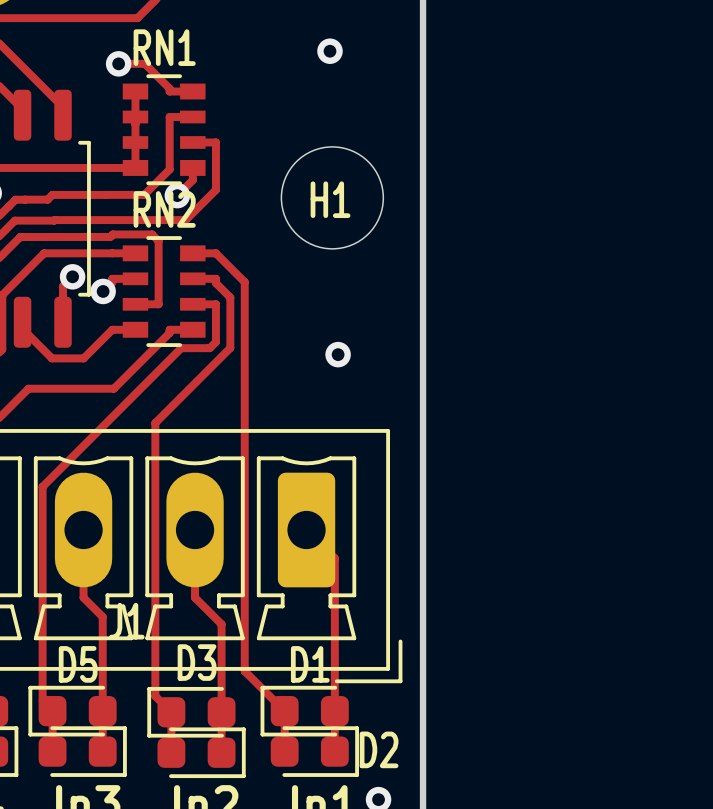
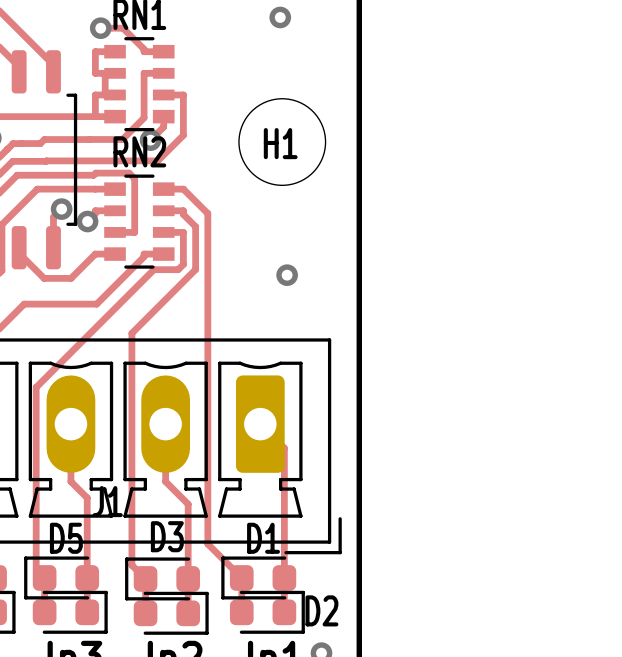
track: (135, 91) (135, 167) -> (115, 51) (95, 51) (95, 73) (115, 73)
track: none -> (105, 73) (105, 94)
track: none -> (115, 94) (95, 94) (95, 116)

